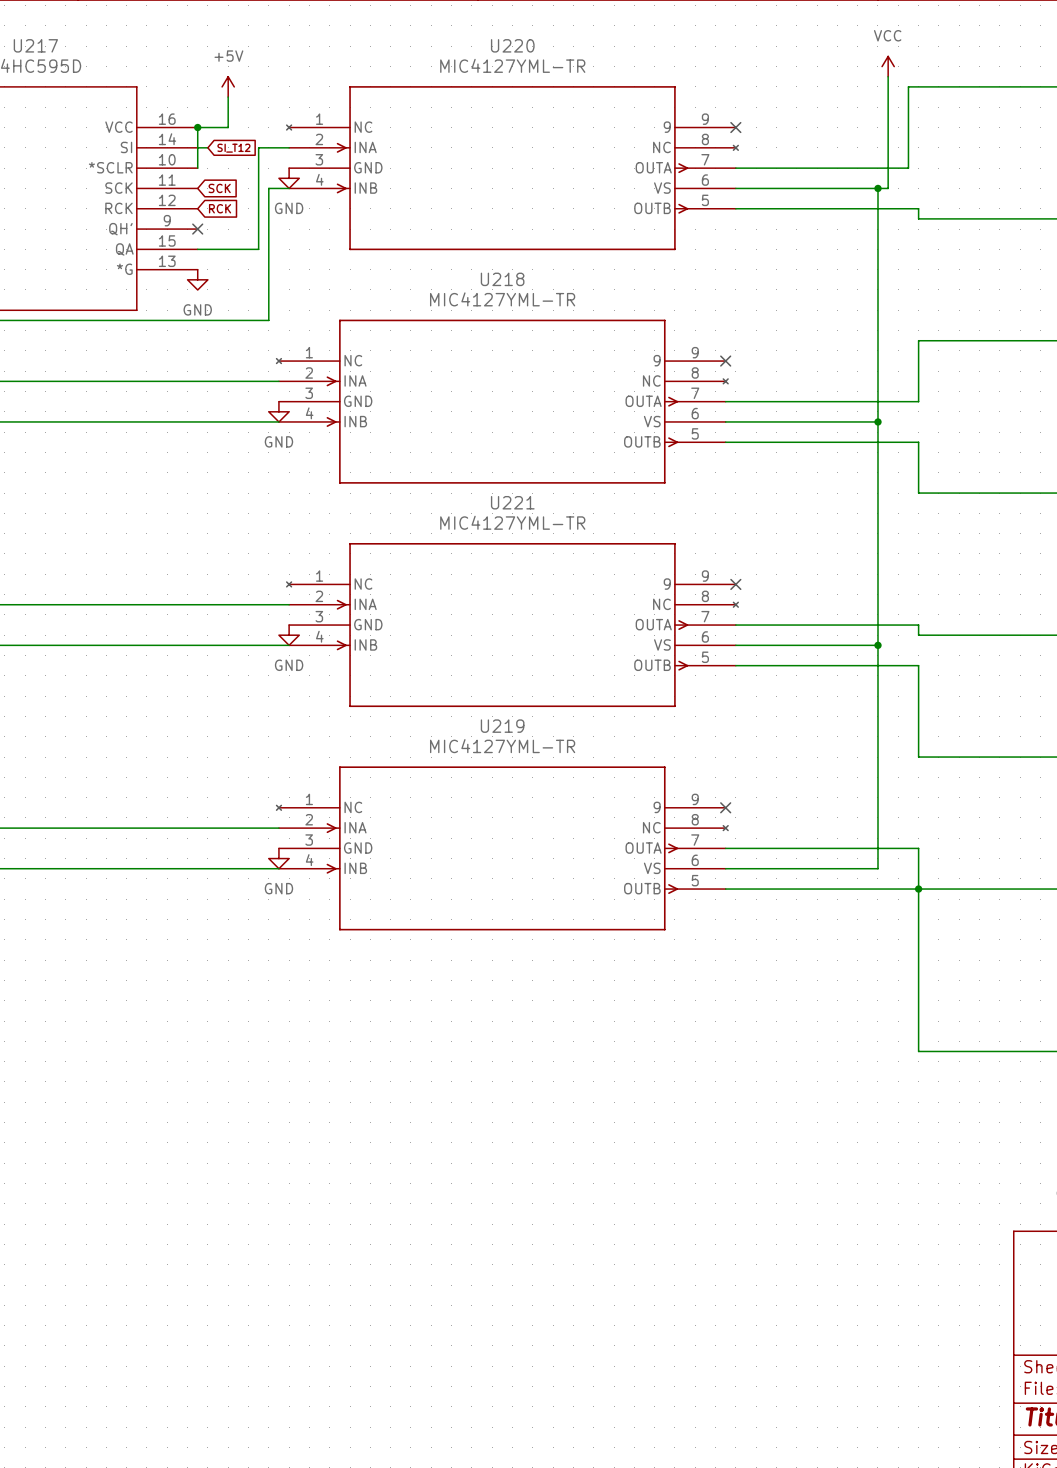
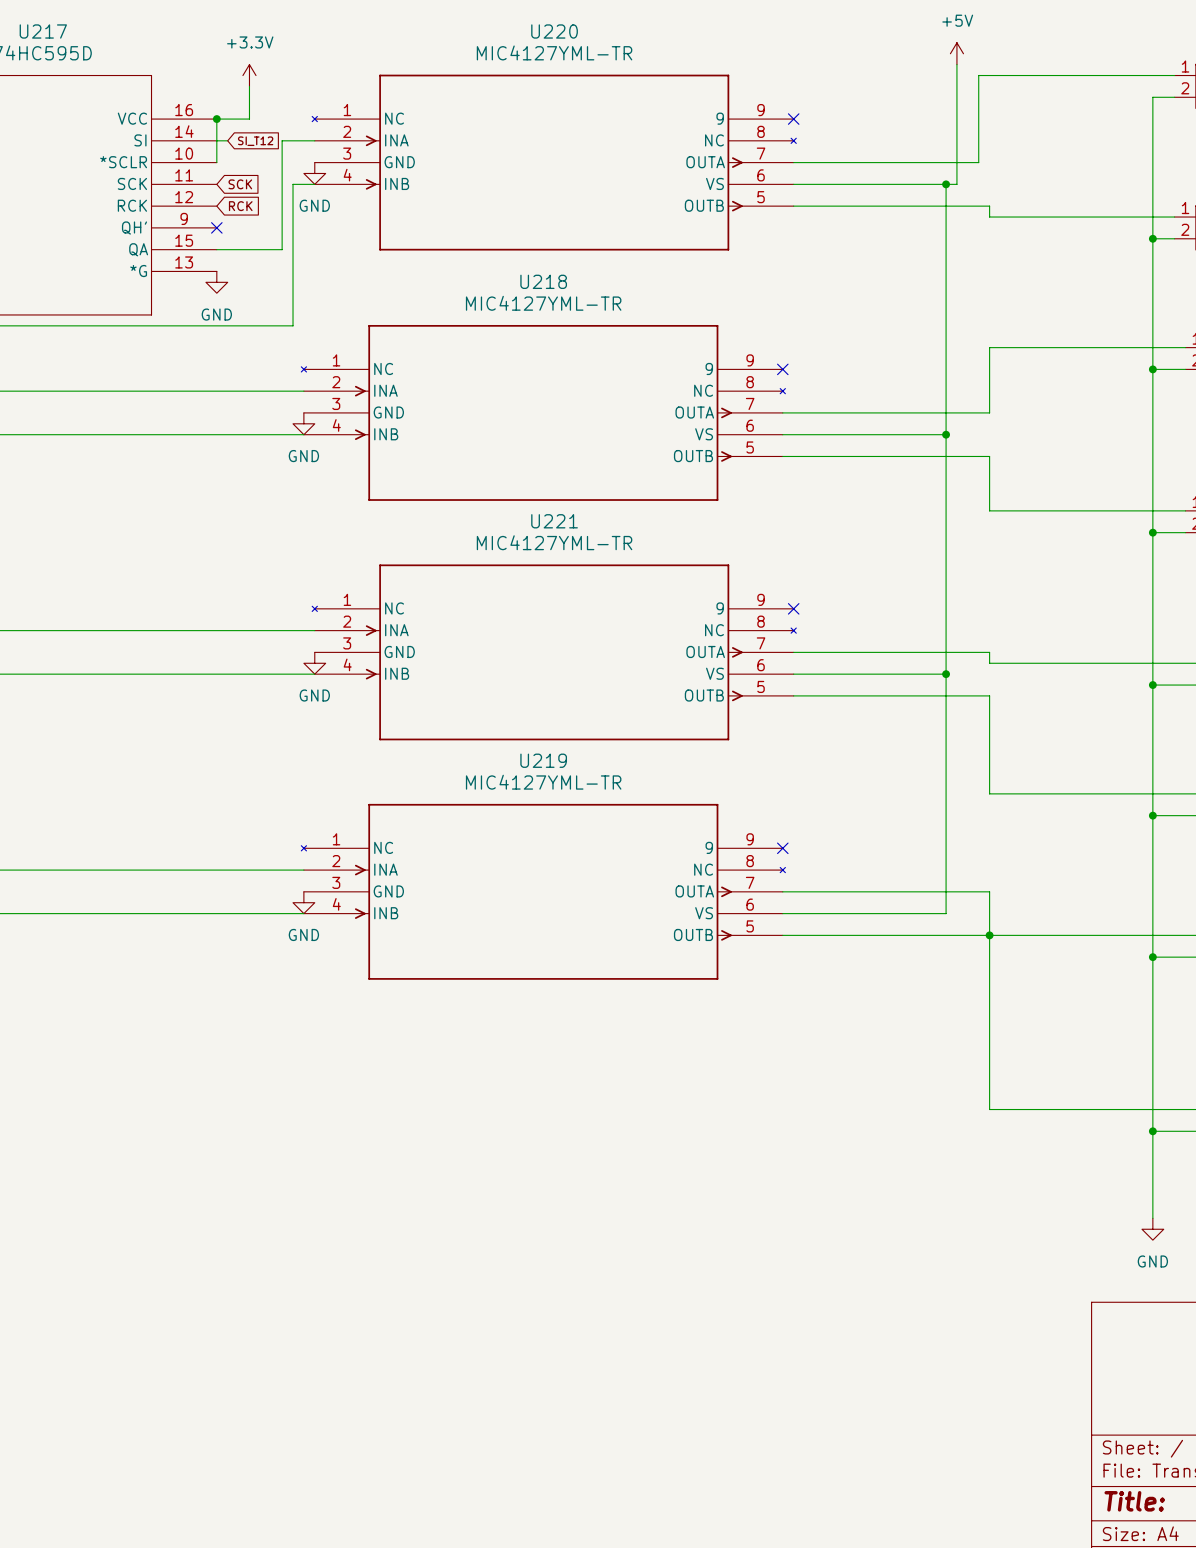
power symbol: VCC (888, 66) -> +5V (956, 53)
power symbol: +5V (228, 86) -> +3.3V (249, 75)

